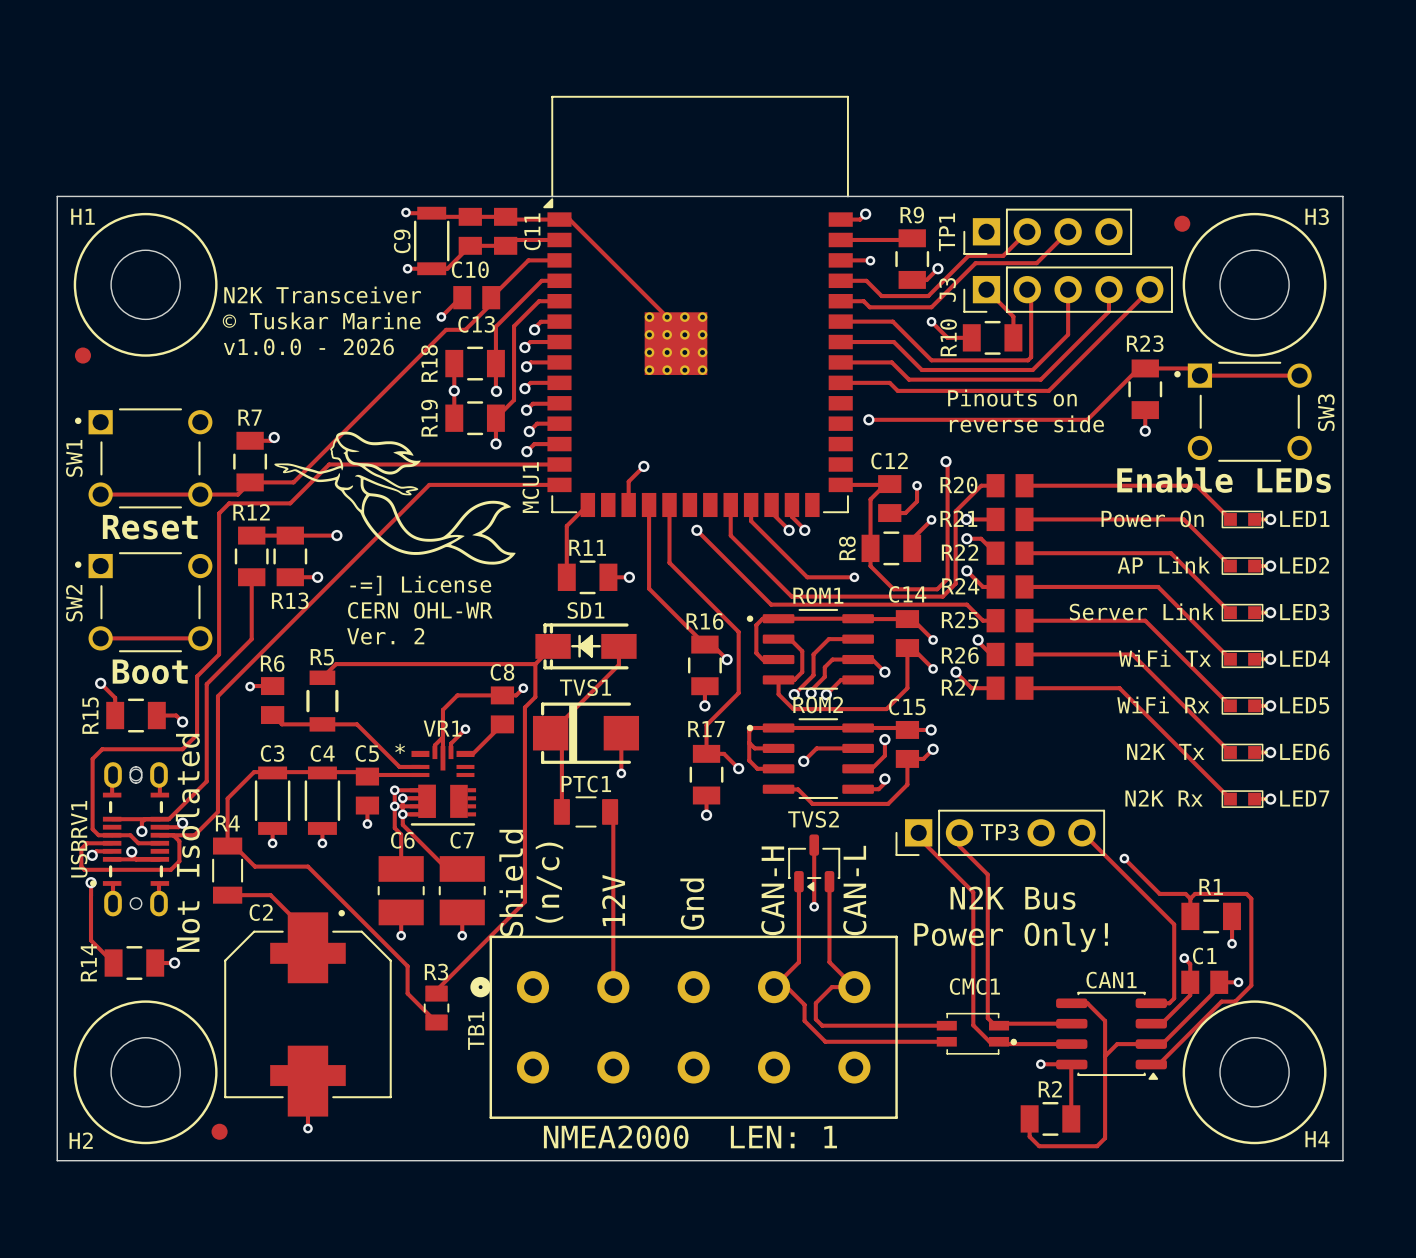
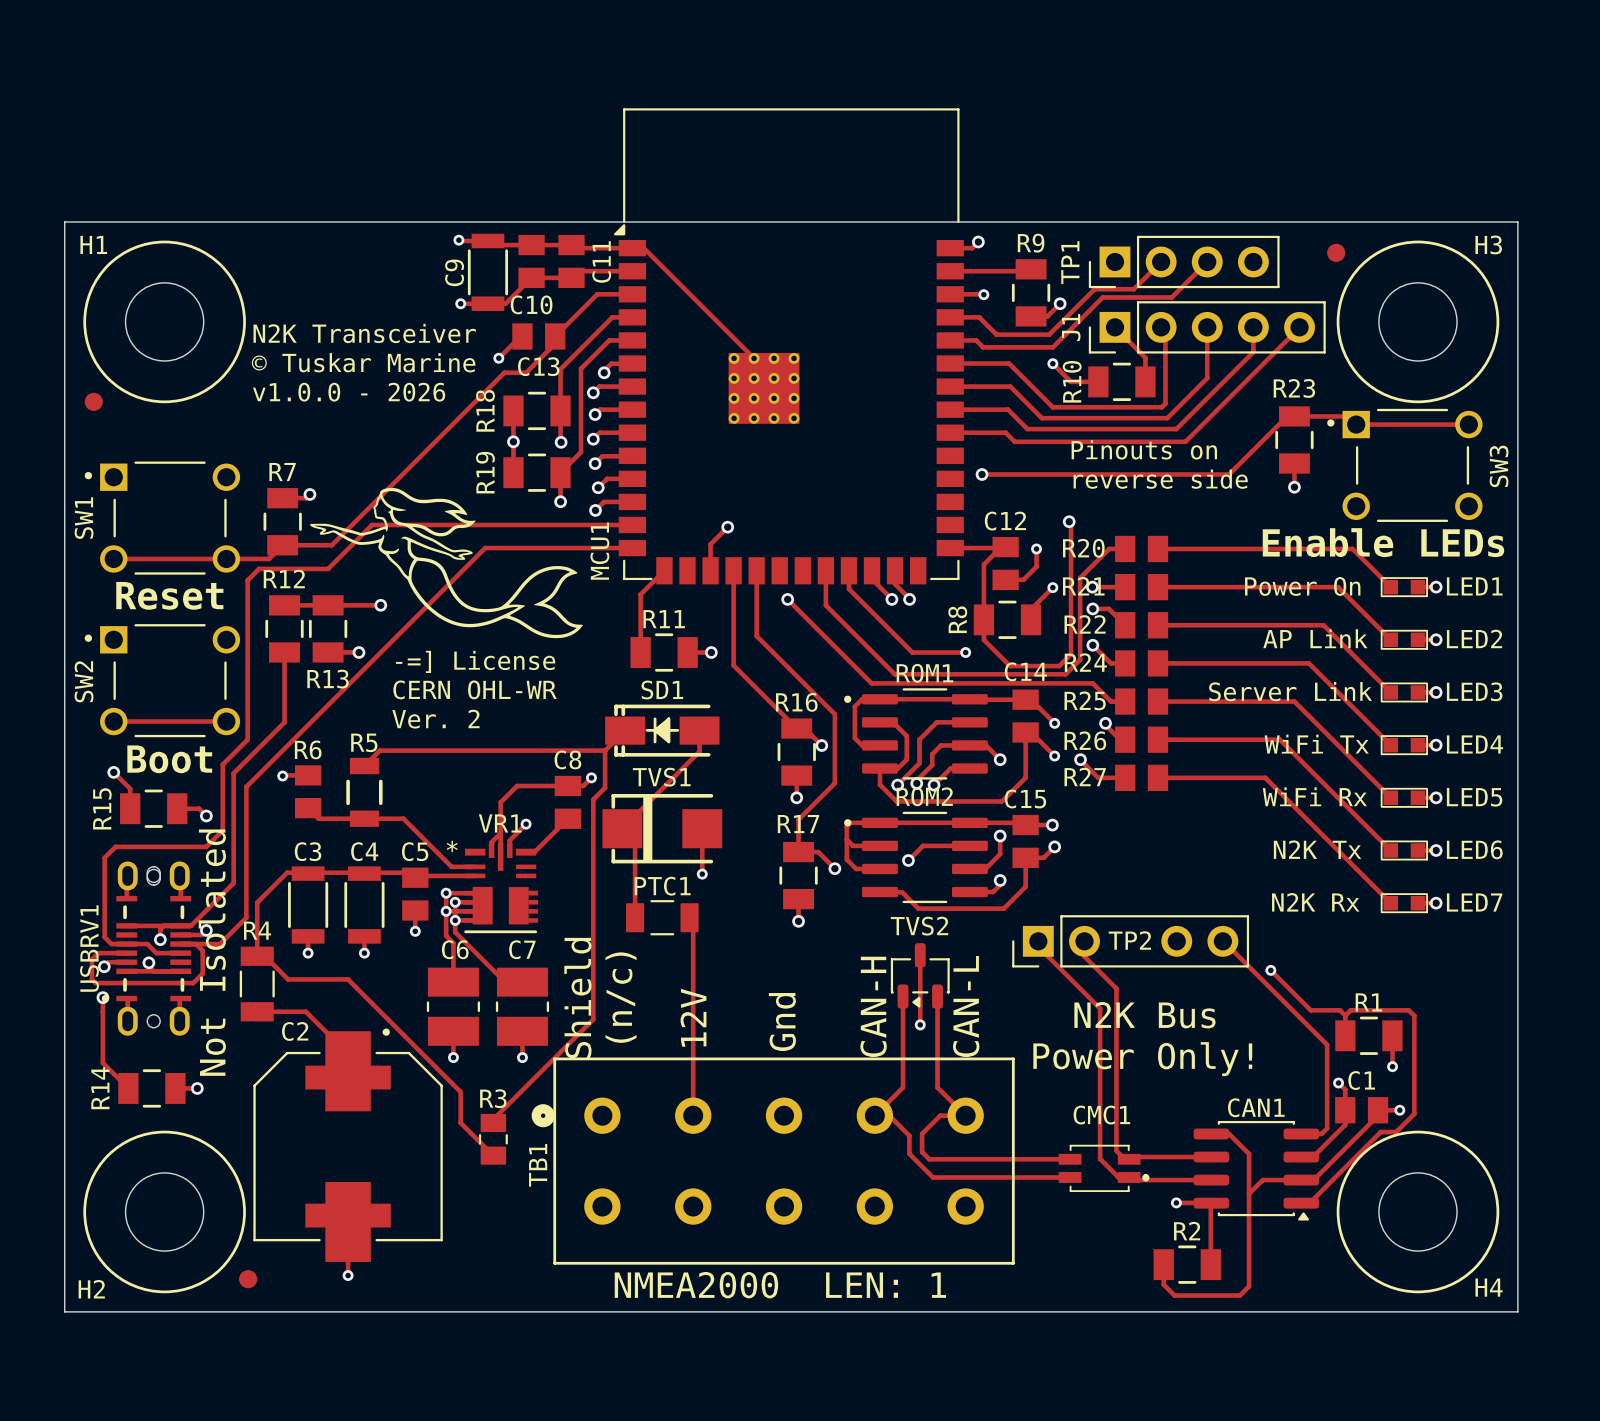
J3 name: J3 (947, 289) -> J1 (1071, 327)
TP3 name: TP3 (999, 832) -> TP2 (1129, 940)

